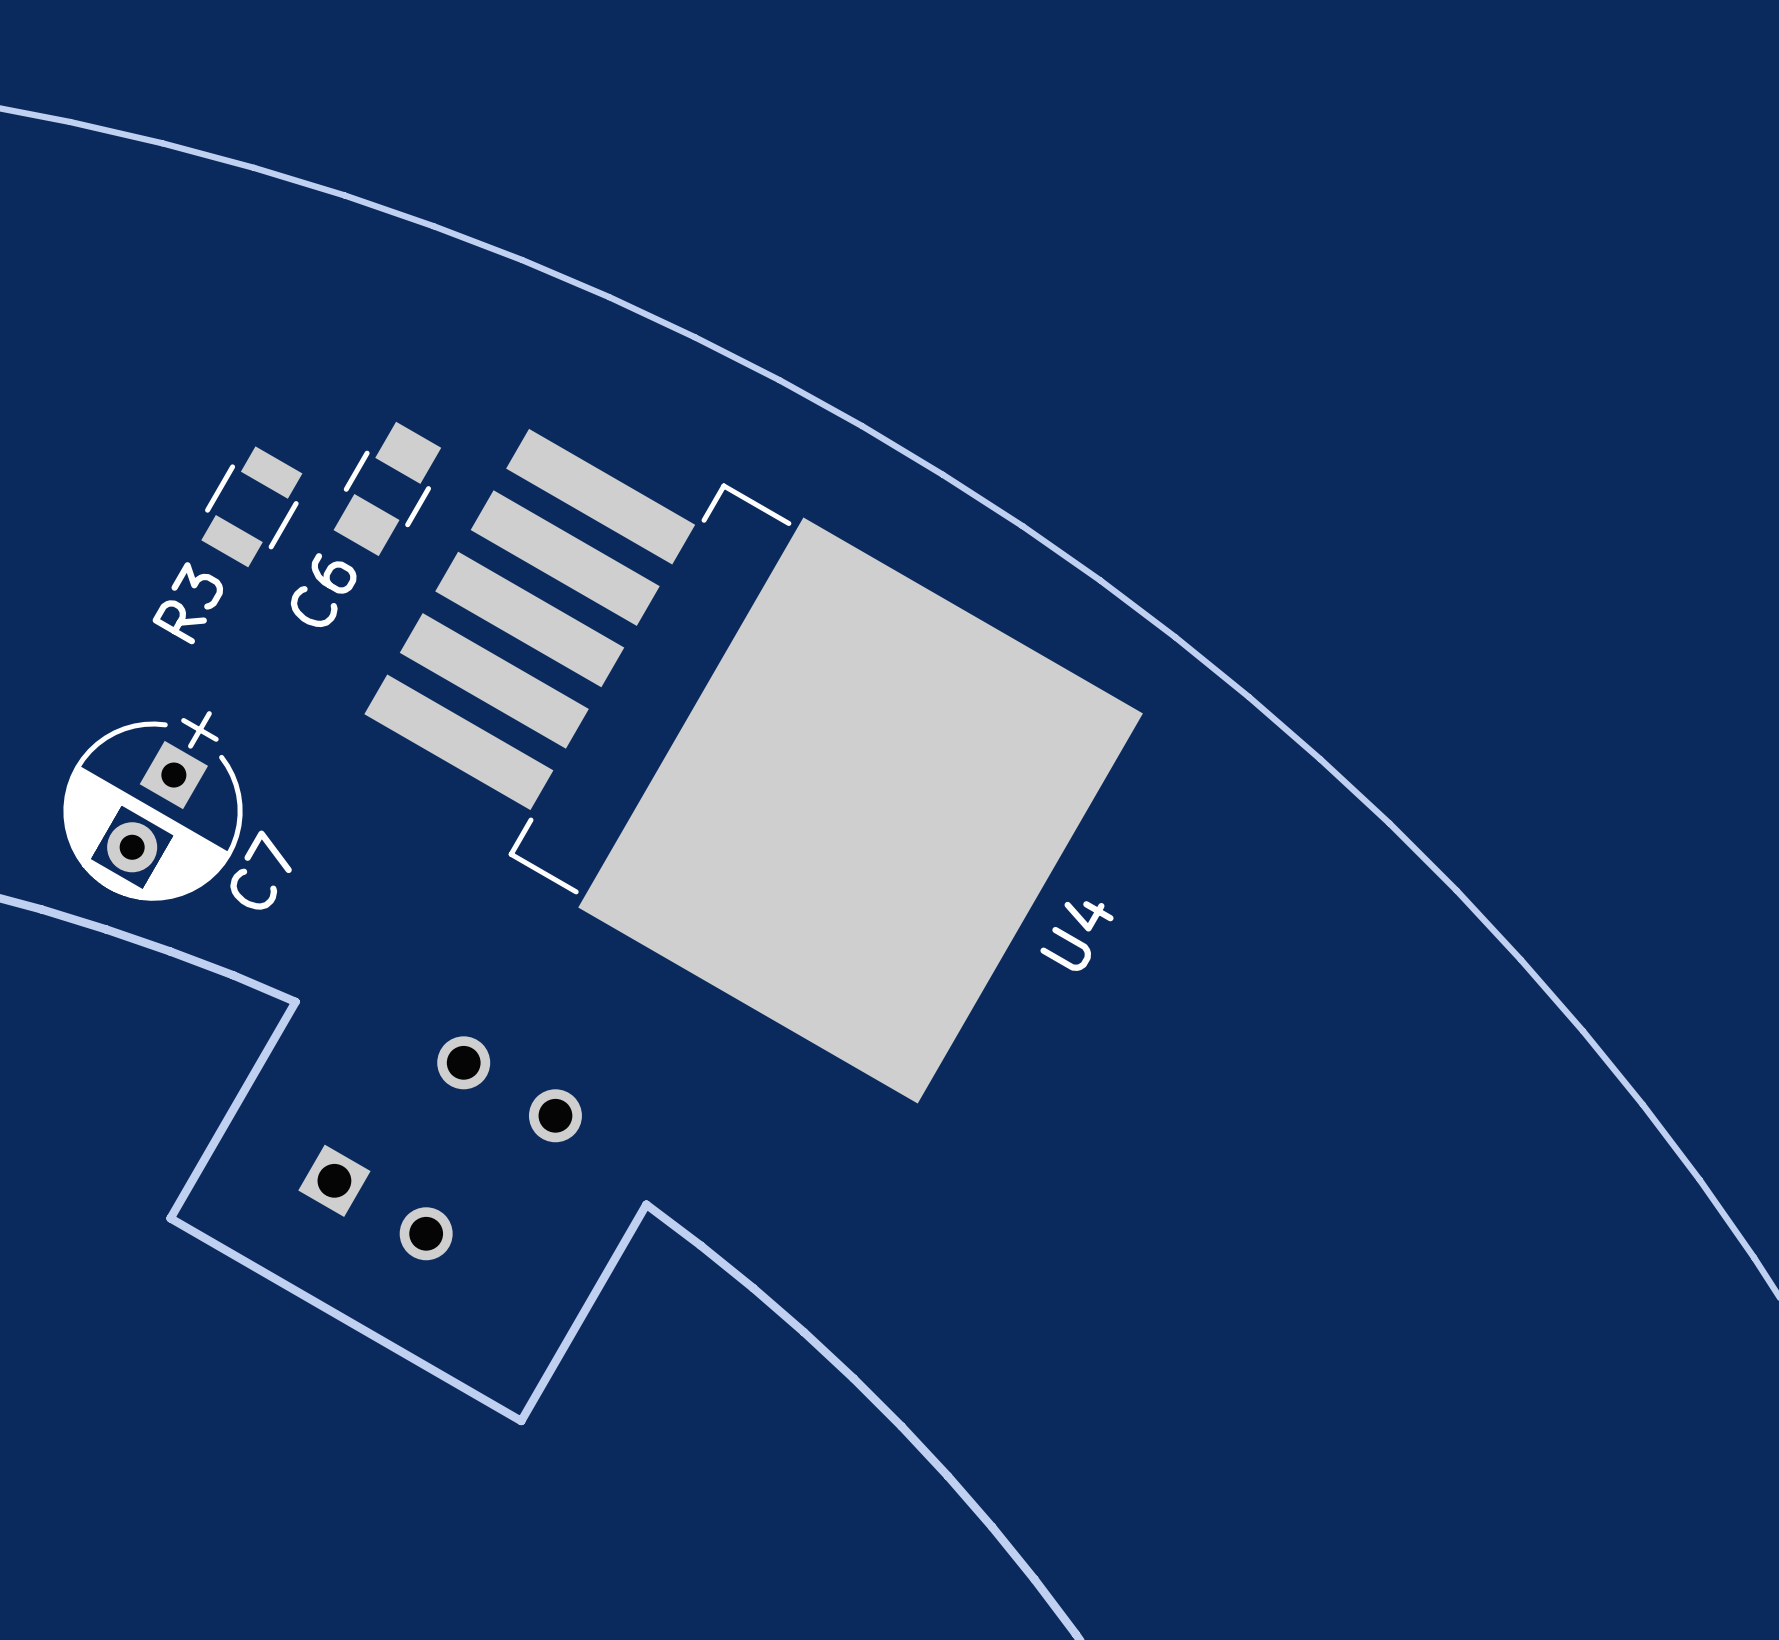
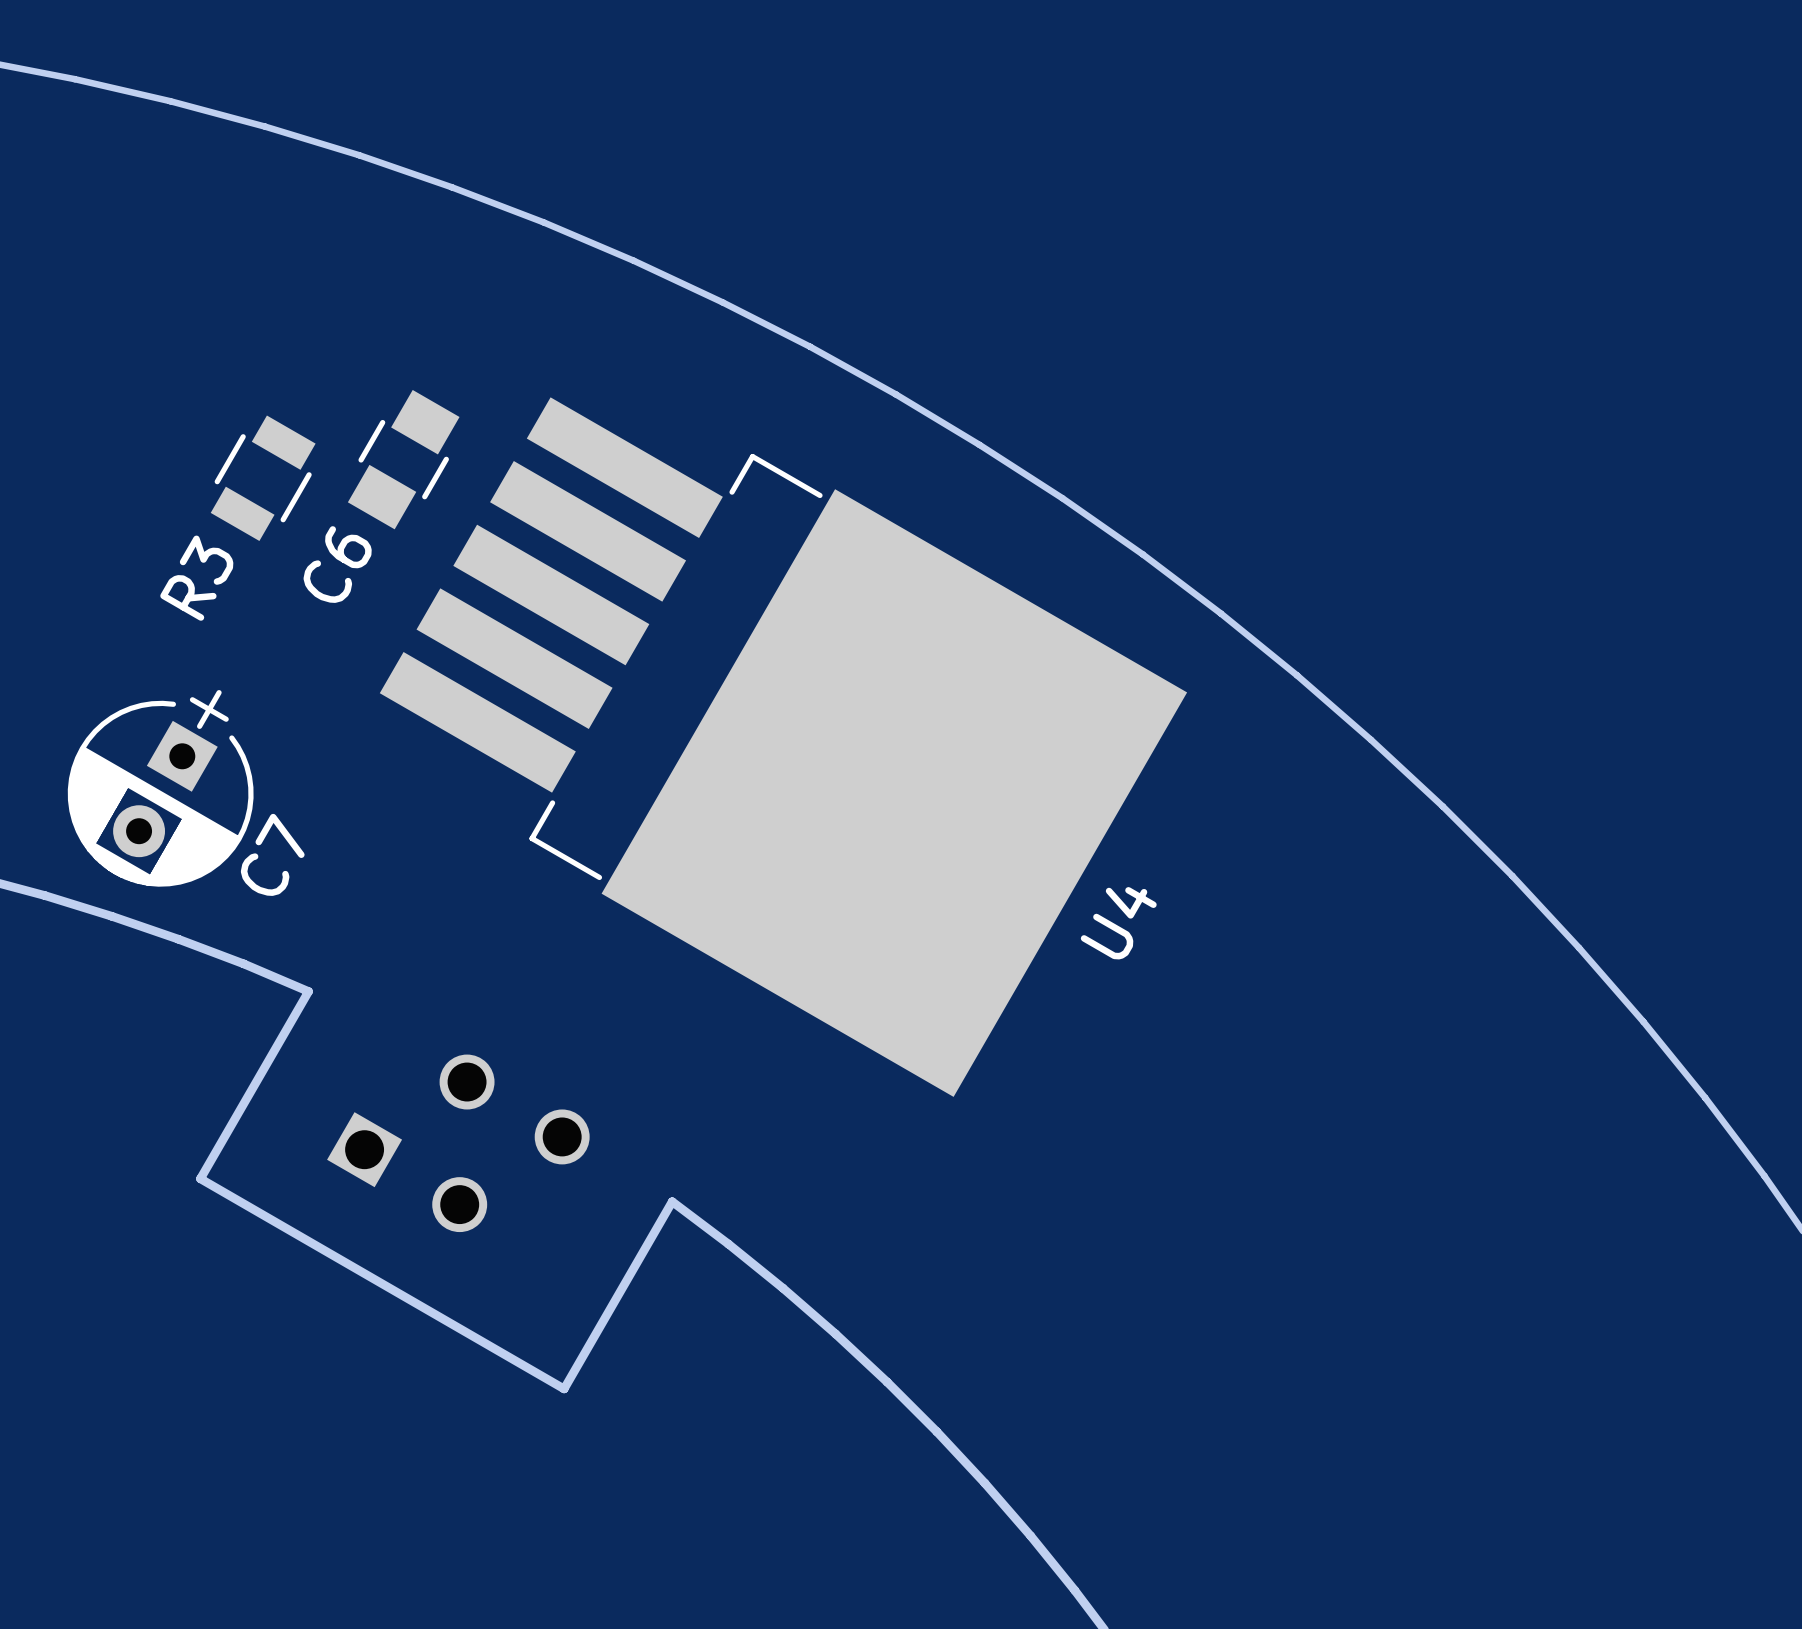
board edge: (295, 1001) (170, 1218) (521, 1421) (646, 1204) -> (308, 991) (200, 1178) (564, 1388) (672, 1201)
part footprint: [298, 1036, 582, 1261] -> [327, 1054, 590, 1233]

